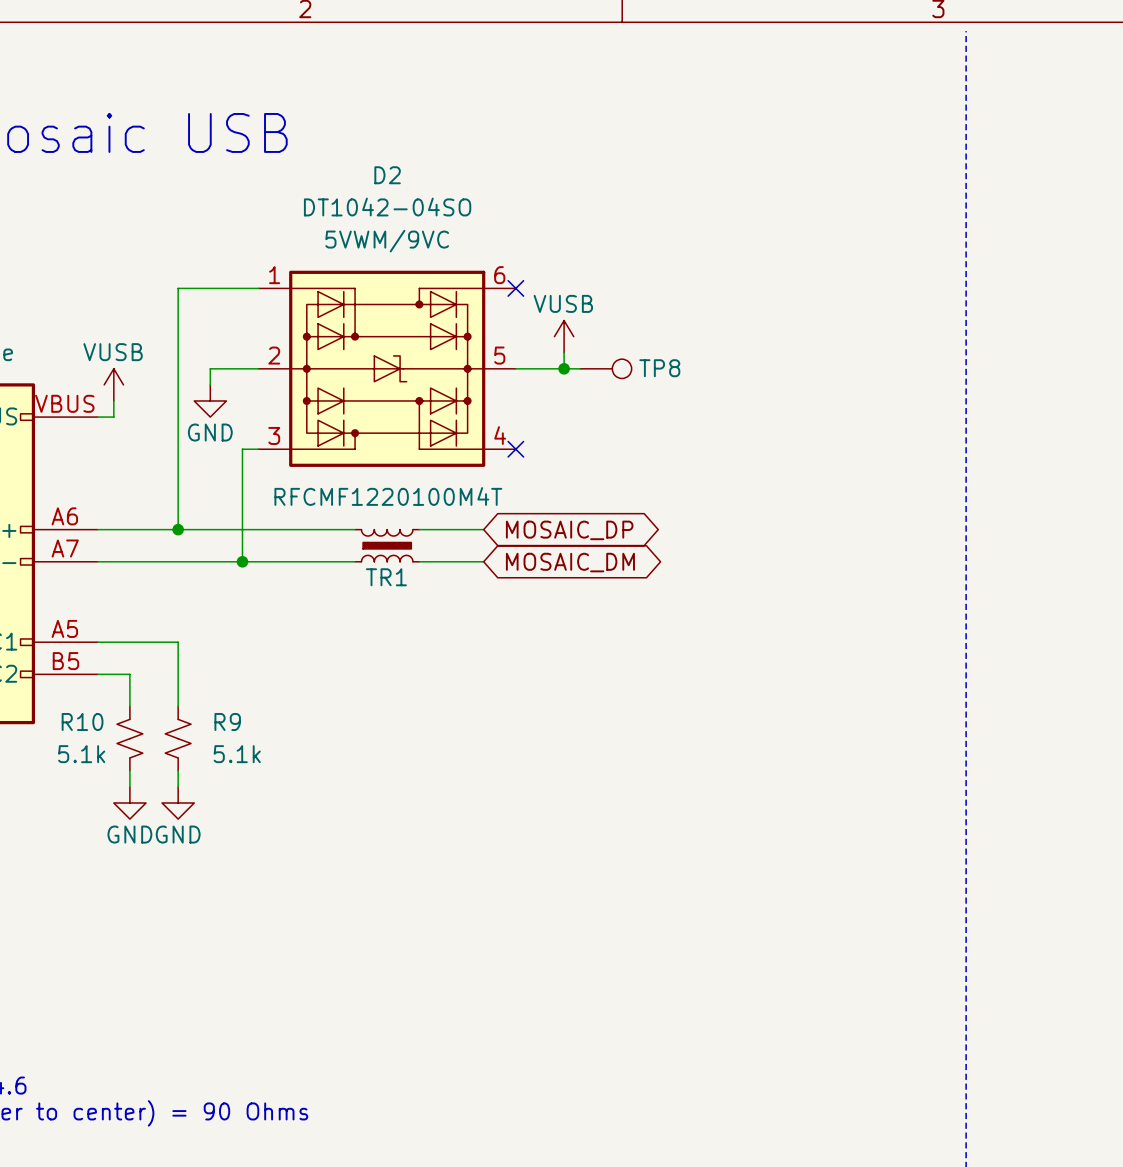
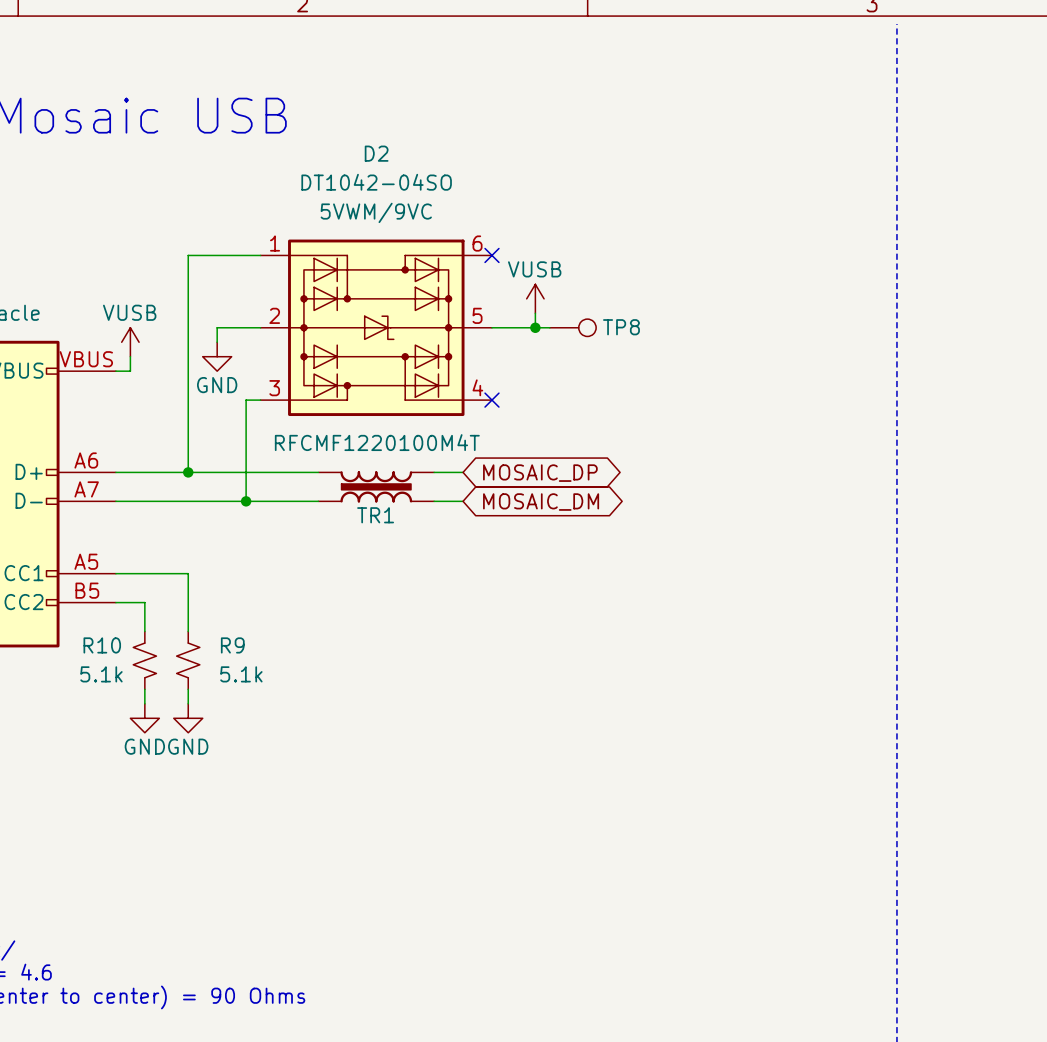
TR1 symbol: [355, 529, 420, 562] -> [318, 471, 435, 503]

